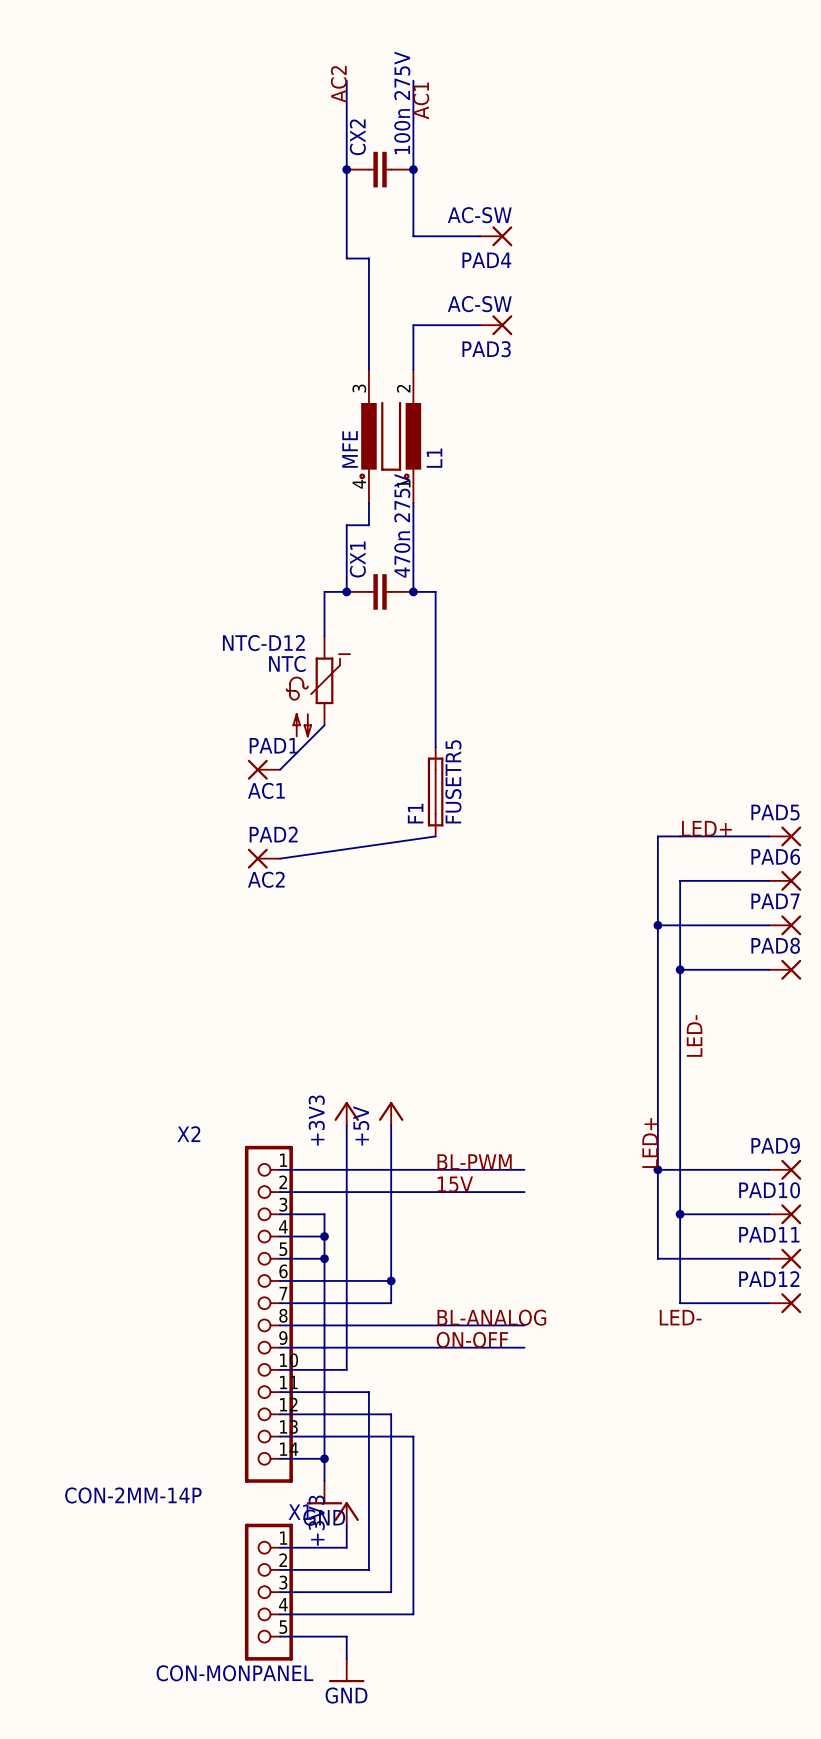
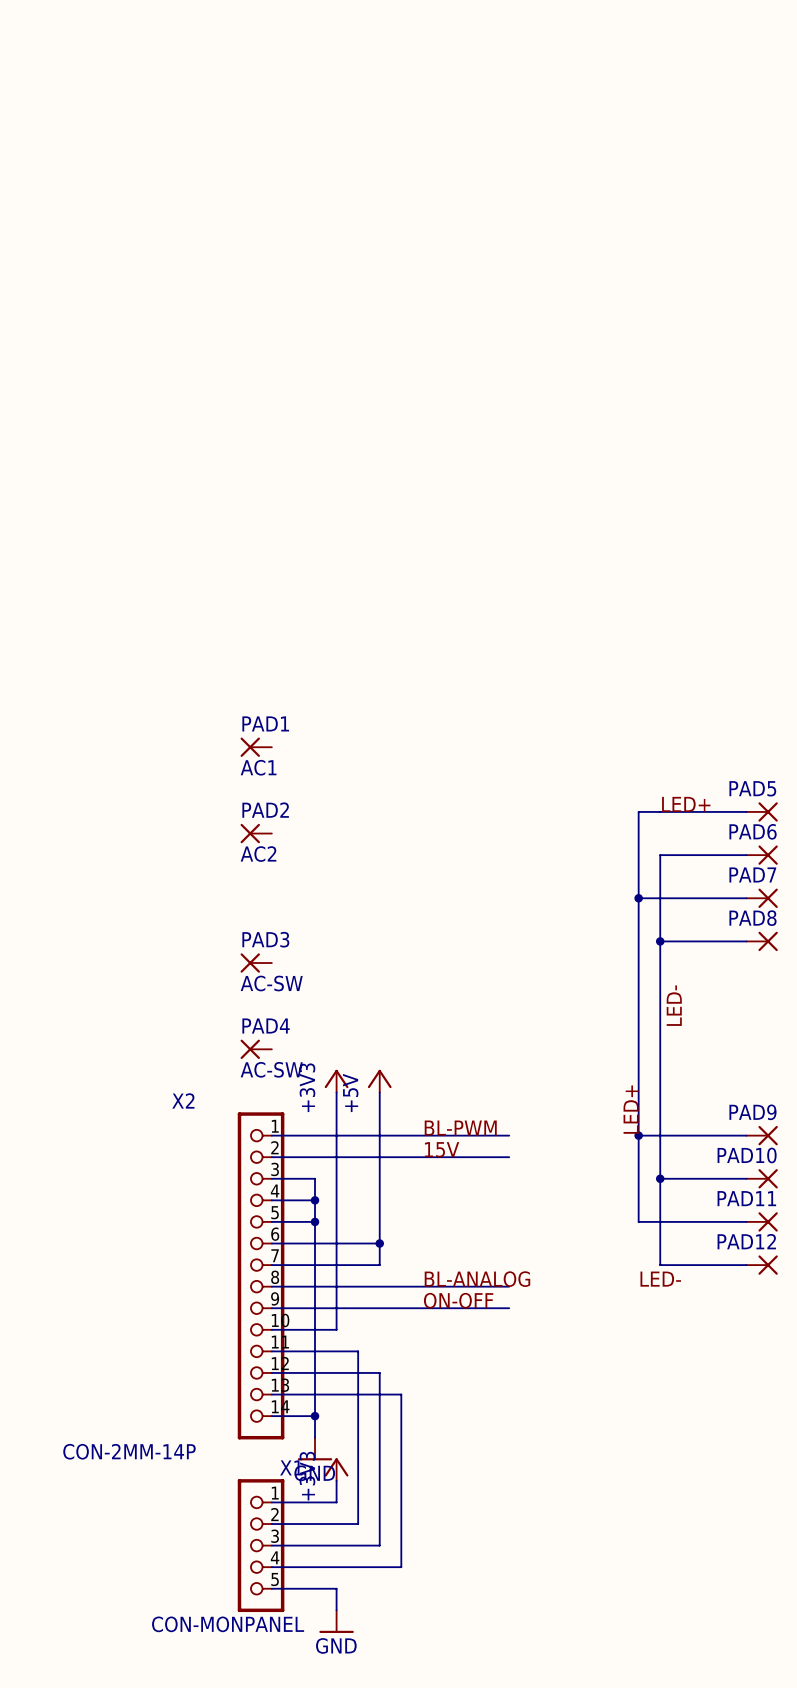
wire: (346, 80) (346, 258) (368, 258) (368, 369) -> none
wire: (413, 80) (413, 236) (480, 236) -> none
label: AC2 (338, 84) -> none
label: AC1 (421, 100) -> none
junction: (346, 169) -> none
CX2: 100n 275V (380, 169) -> none
junction: (413, 169) -> none
PAD4 position: (496, 236) -> (256, 1049)
PAD4 rotation: 0° (502, 236) -> 180° (250, 1049)
wire: (480, 325) (413, 325) (413, 369) -> none
PAD3 position: (496, 325) -> (256, 963)
PAD3 rotation: 0° (502, 325) -> 180° (250, 963)
L1: MFE (390, 436) -> none
wire: (368, 503) (368, 525) (346, 525) (346, 591) (324, 591) (324, 636) -> none
wire: (413, 503) (413, 591) (435, 591) (435, 747) -> none
junction: (346, 591) -> none
CX1: 470n 275V (380, 591) -> none
junction: (413, 591) -> none
NTC: NTC-D12 (318, 686) -> none
wire: (324, 725) (280, 769) -> none
F1: FUSETR5 (435, 791) -> none
wire: (435, 836) (280, 858) -> none

